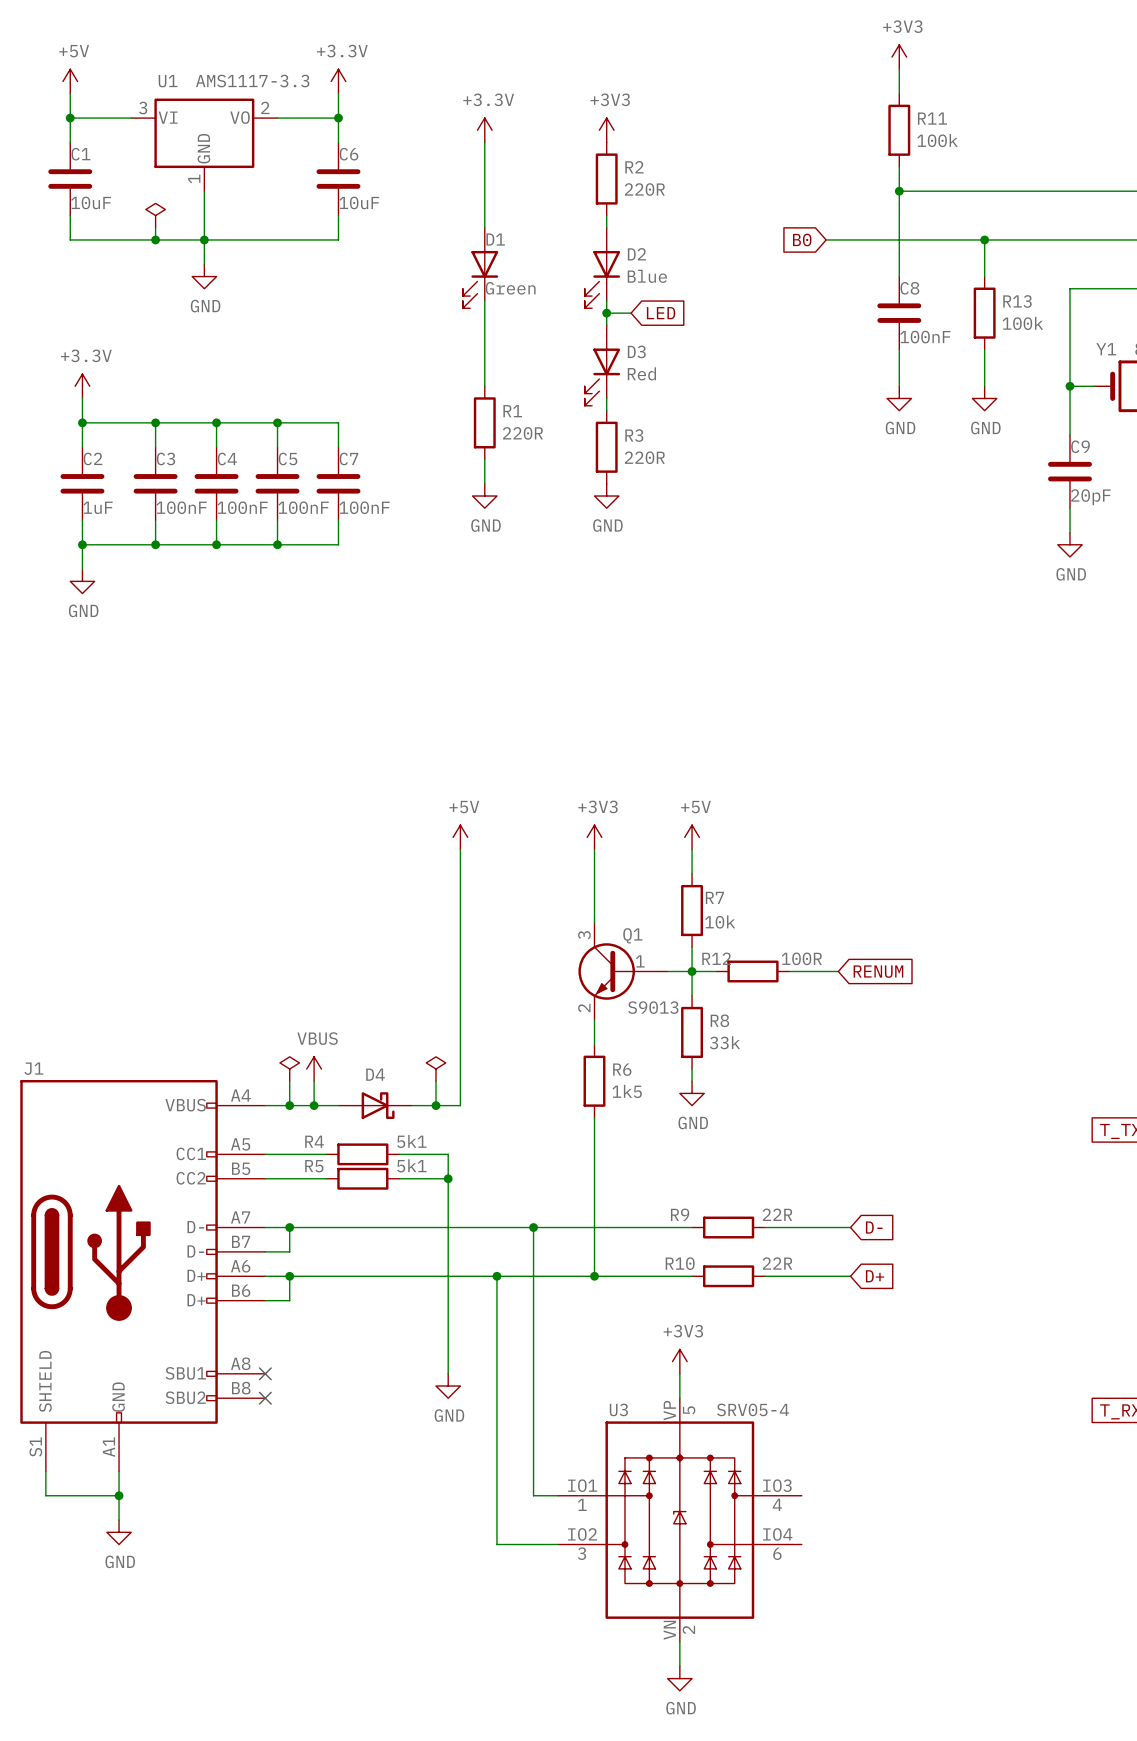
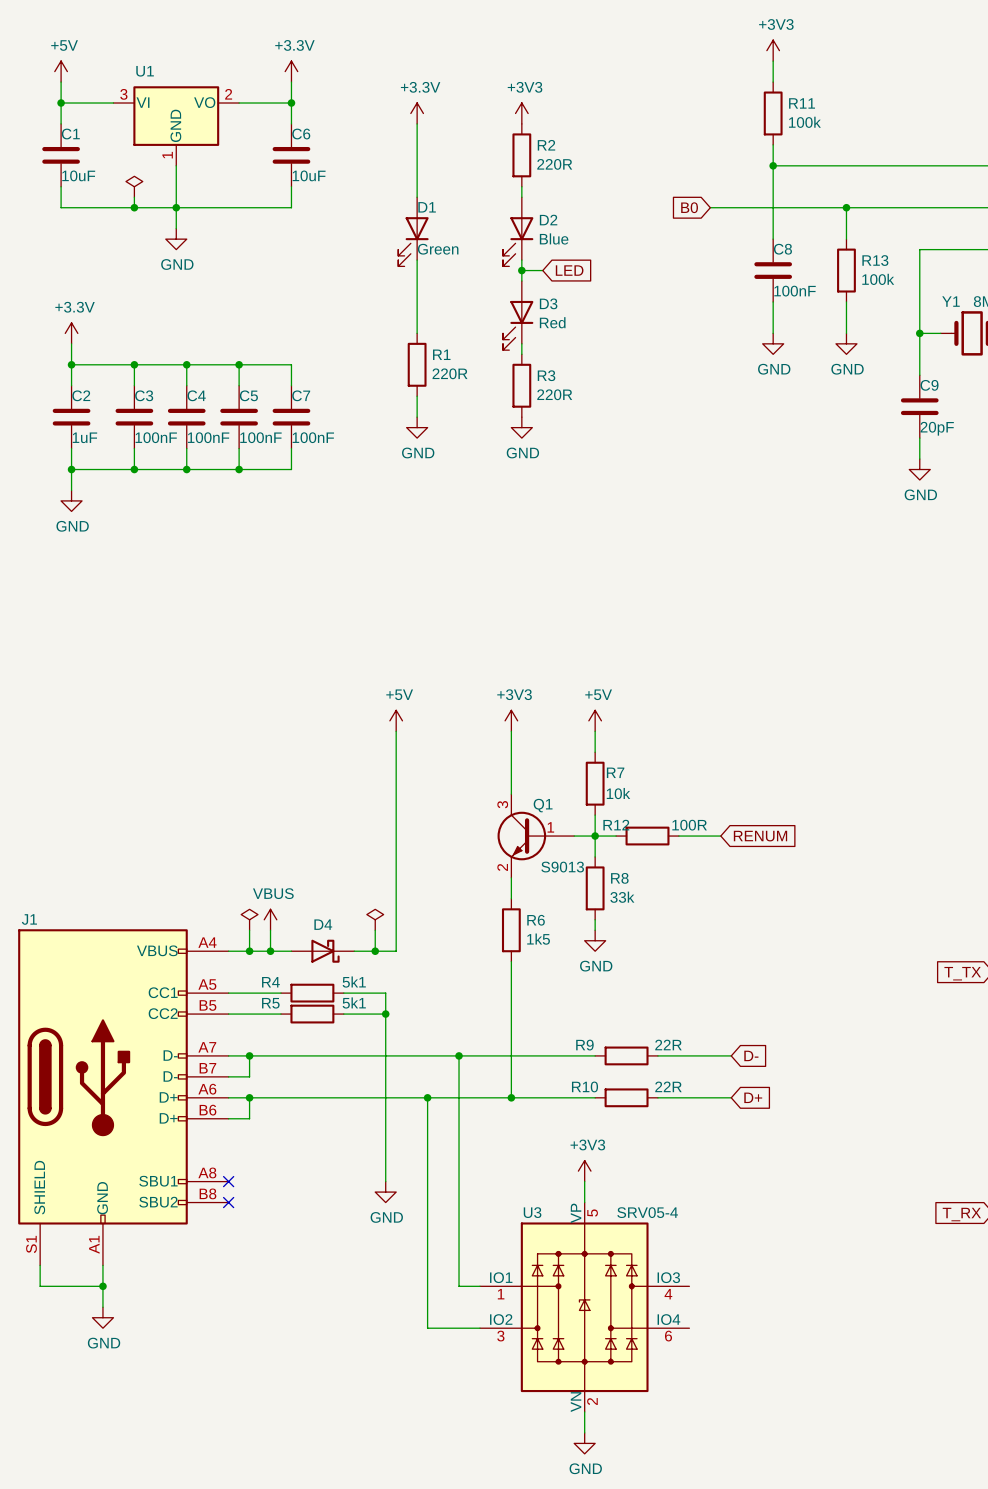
U1 value: AMS1117-3.3 (252, 81) -> none

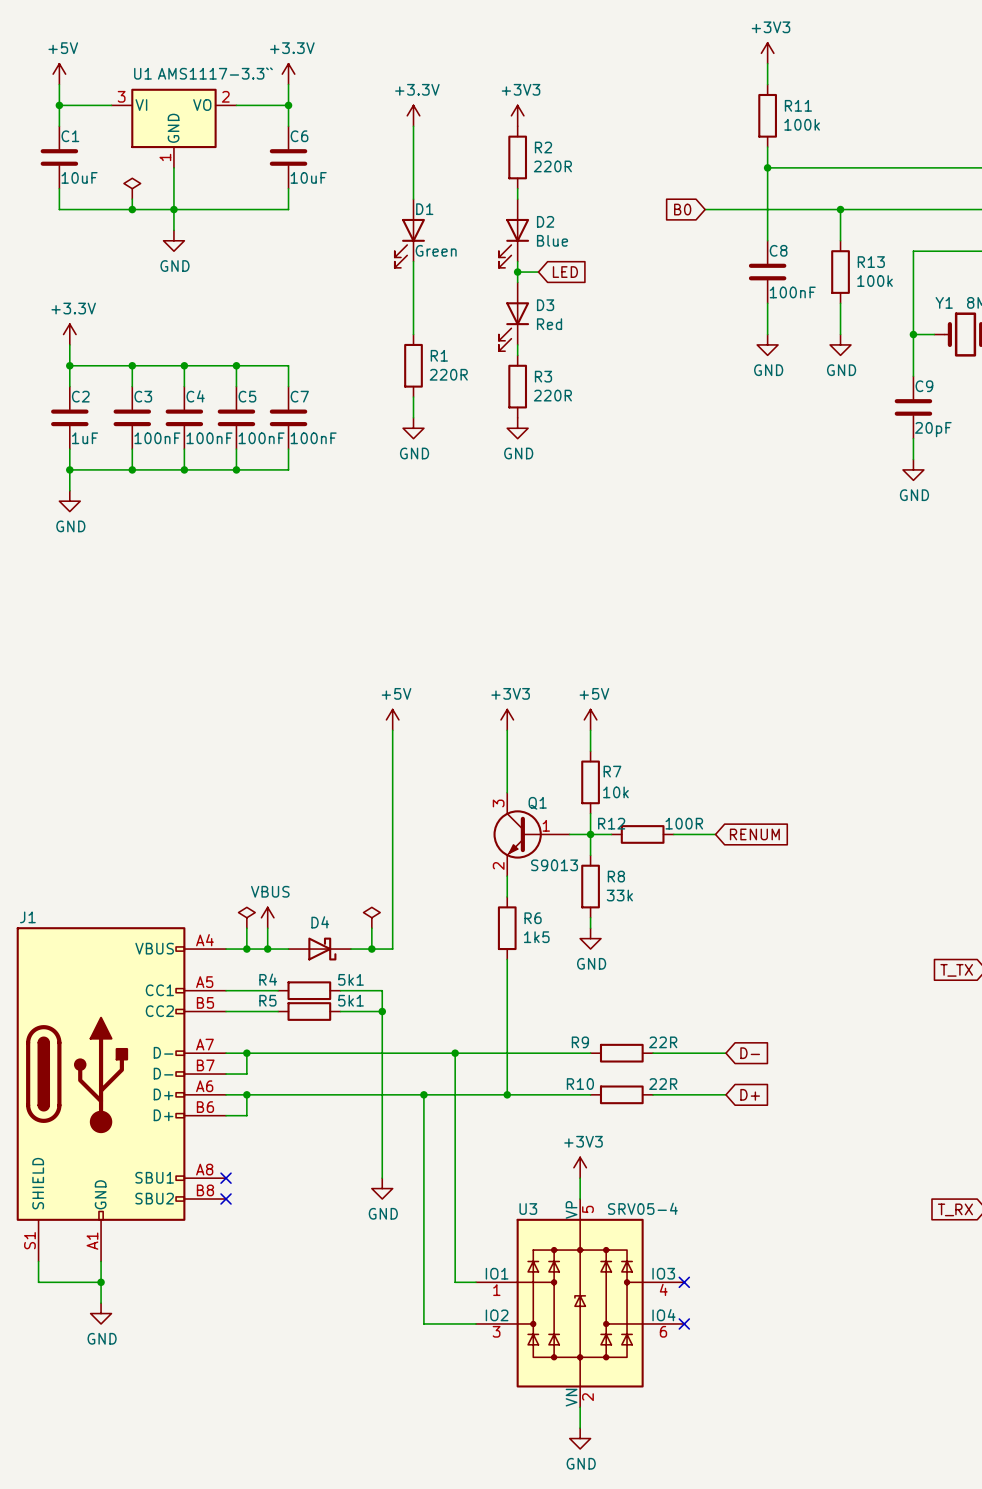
U1 value: none -> AMS1117-3.3`` (215, 73)
no-connect mark: none -> (684, 1282)
no-connect mark: none -> (684, 1323)

